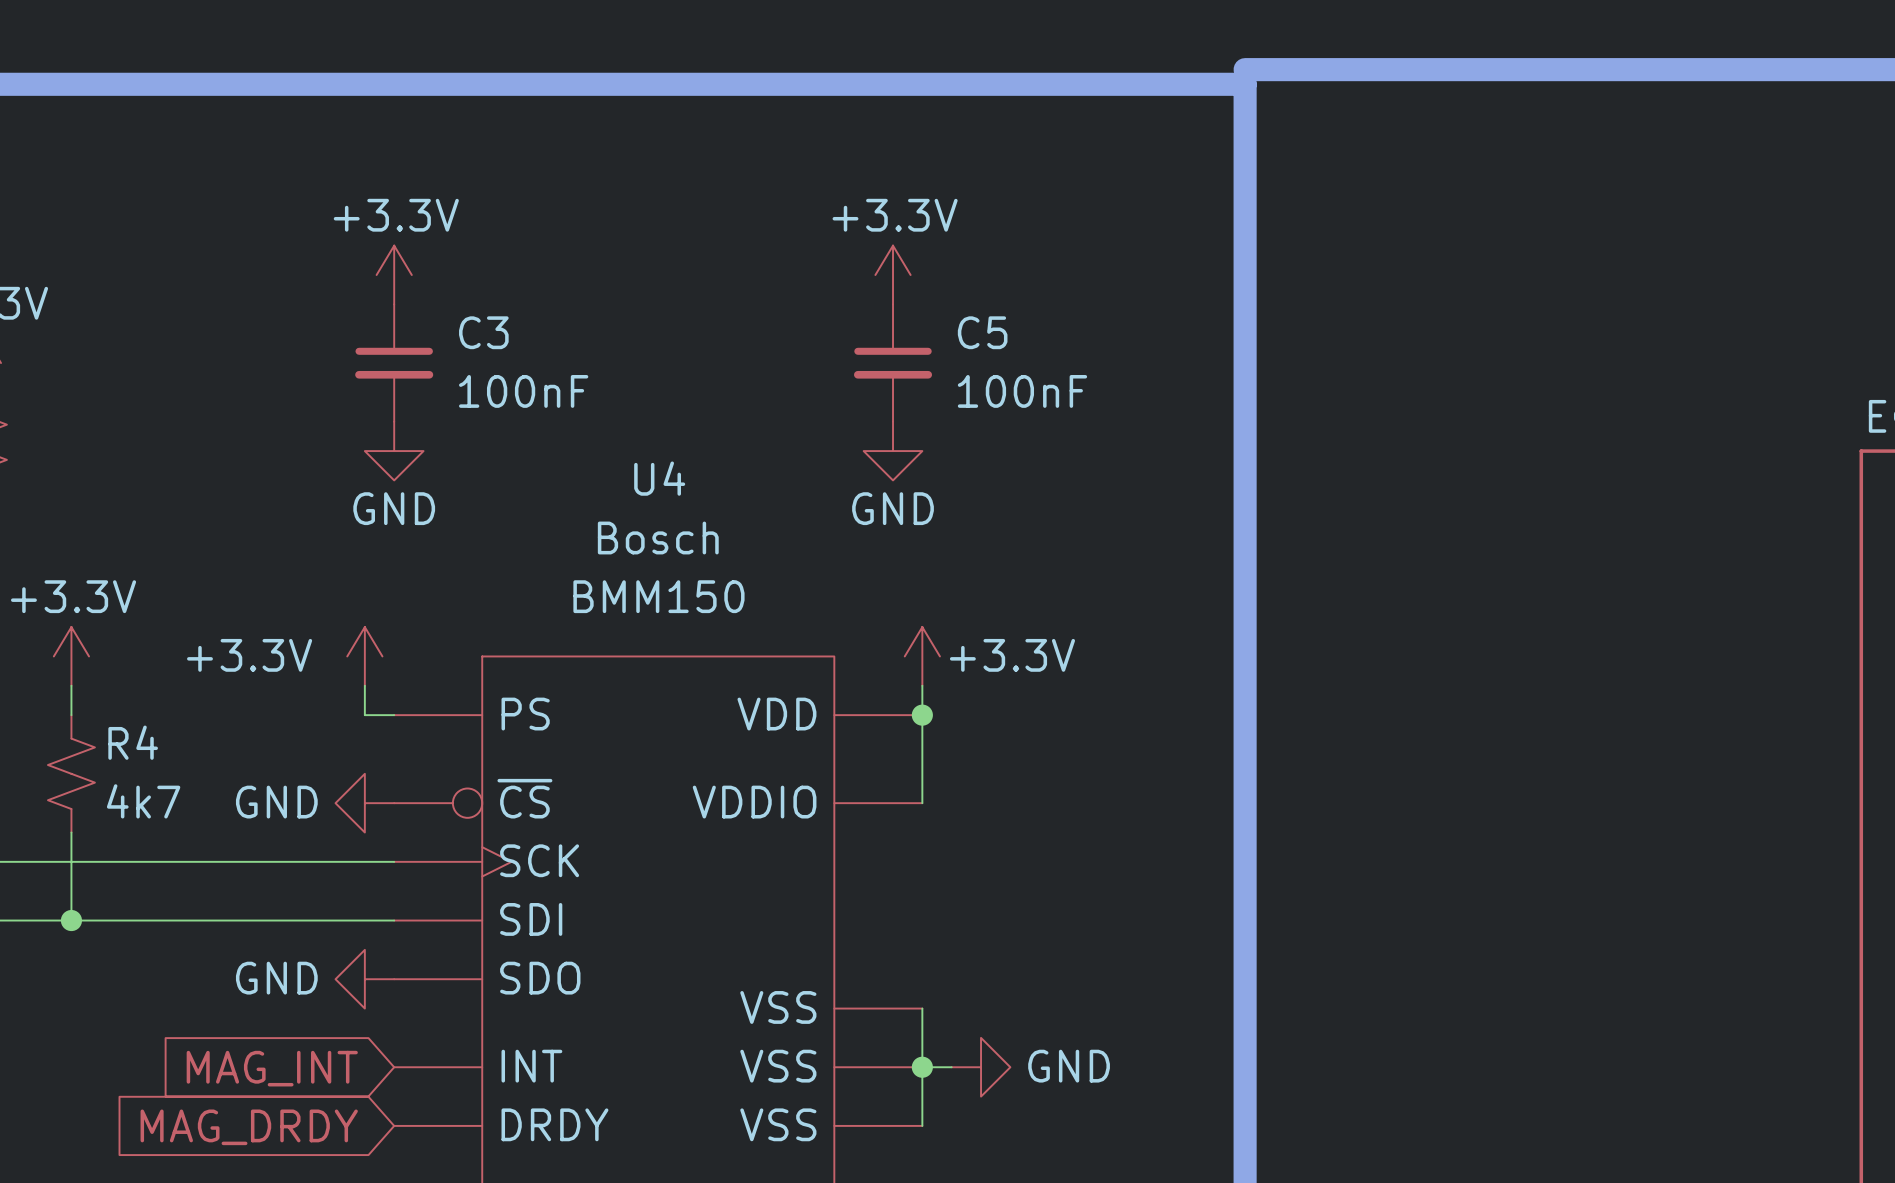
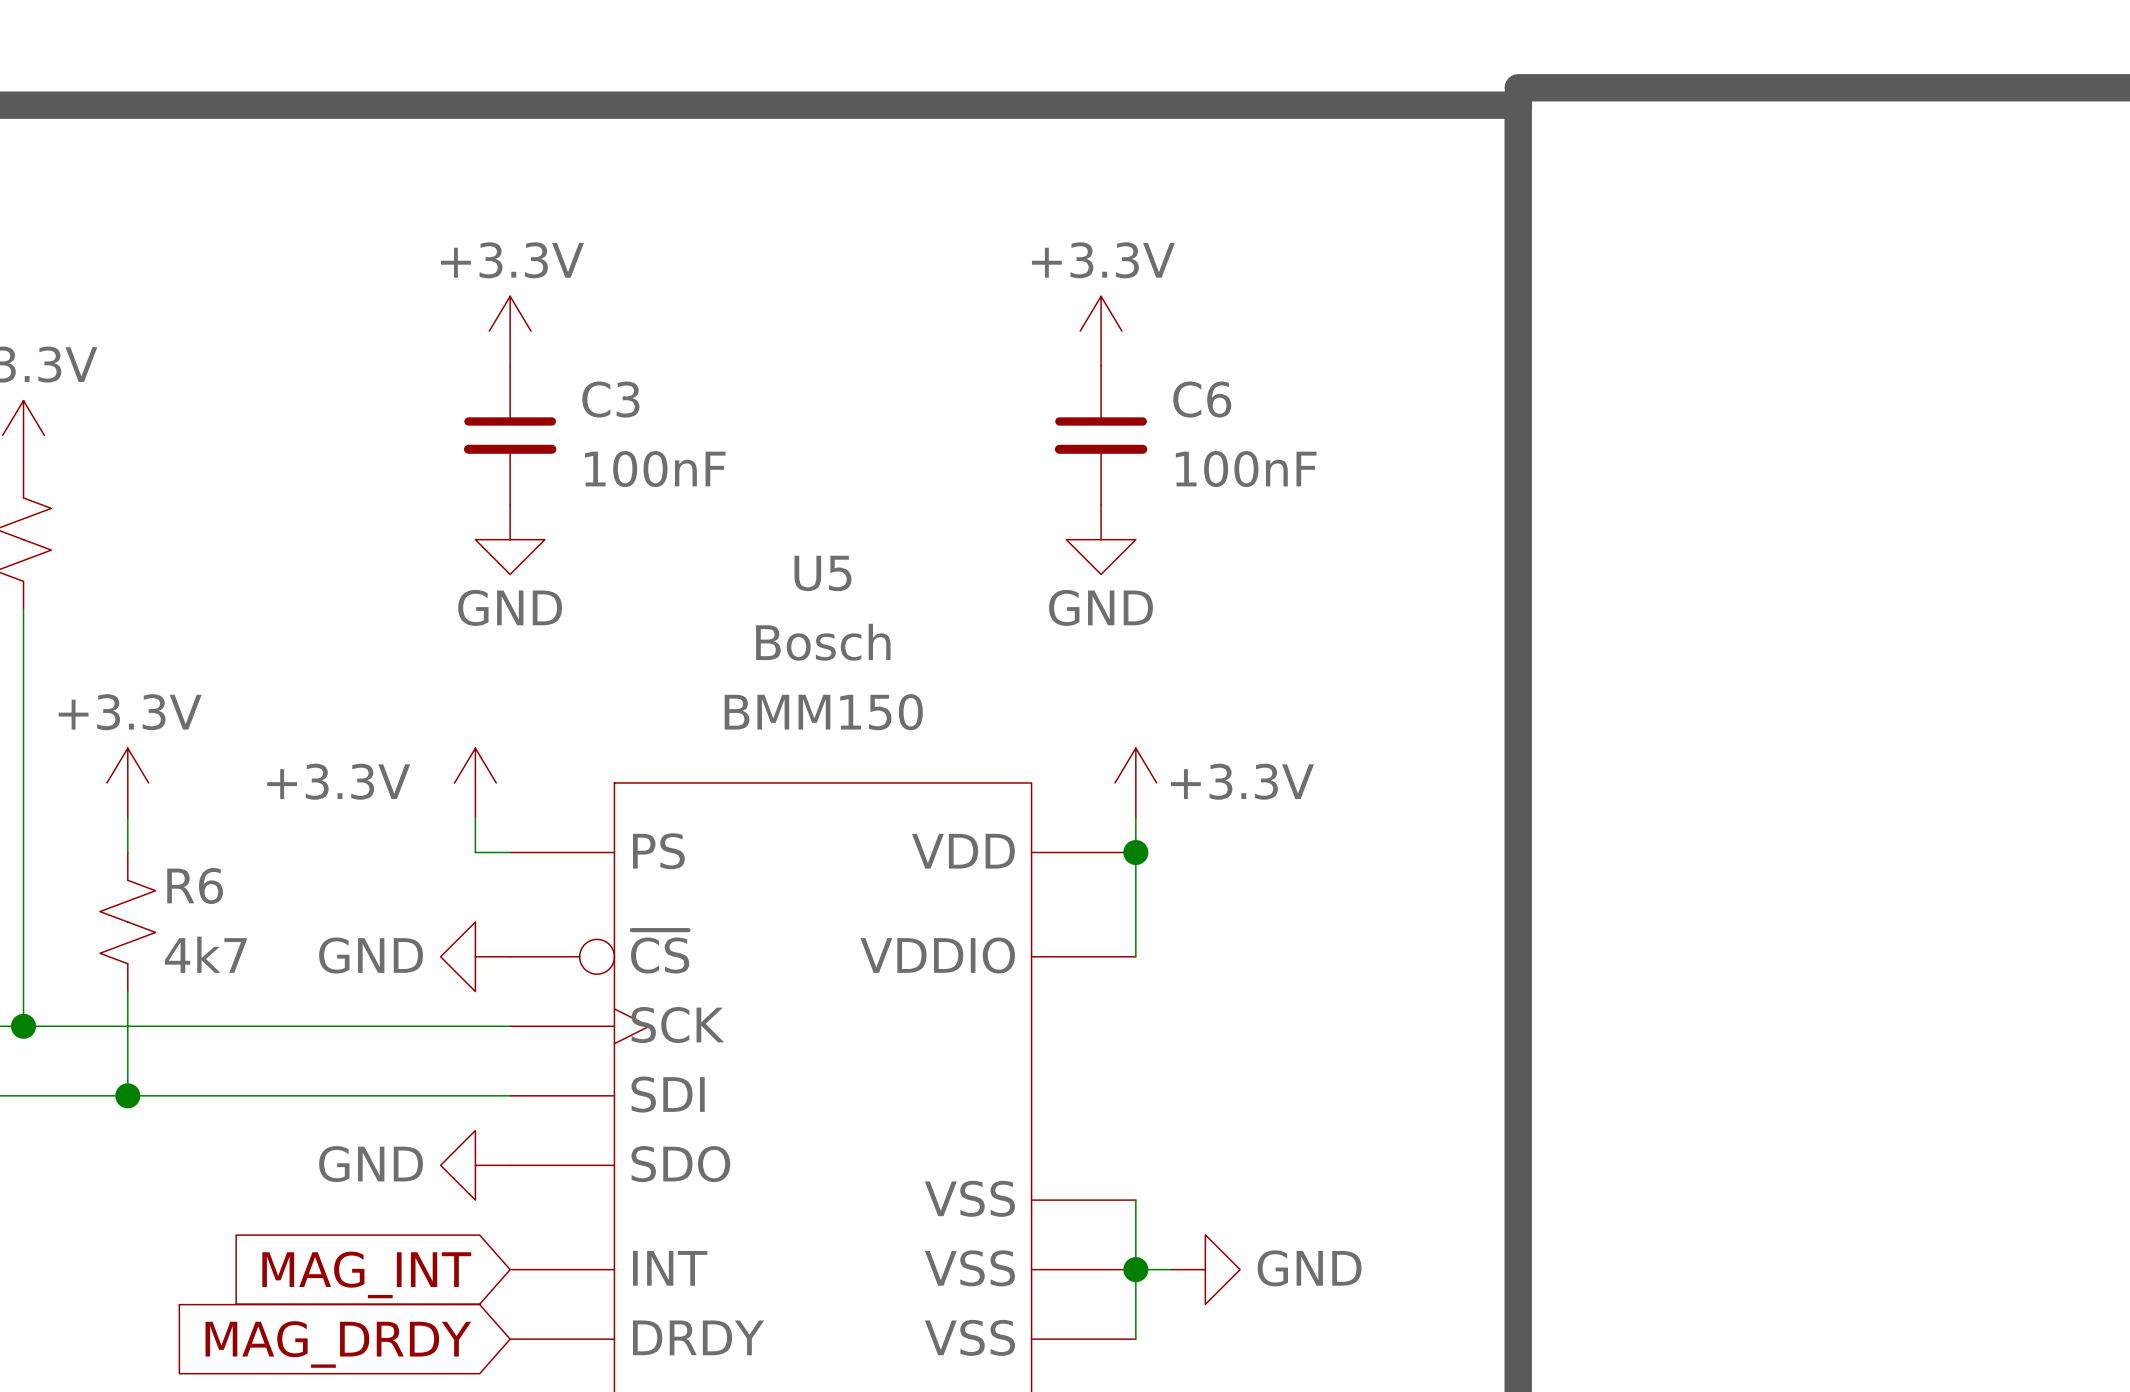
C5 name: C5 (982, 332) -> C6 (1202, 399)
U4 name: U4 (659, 478) -> U5 (822, 573)
R4 name: R4 (133, 742) -> R6 (195, 885)

